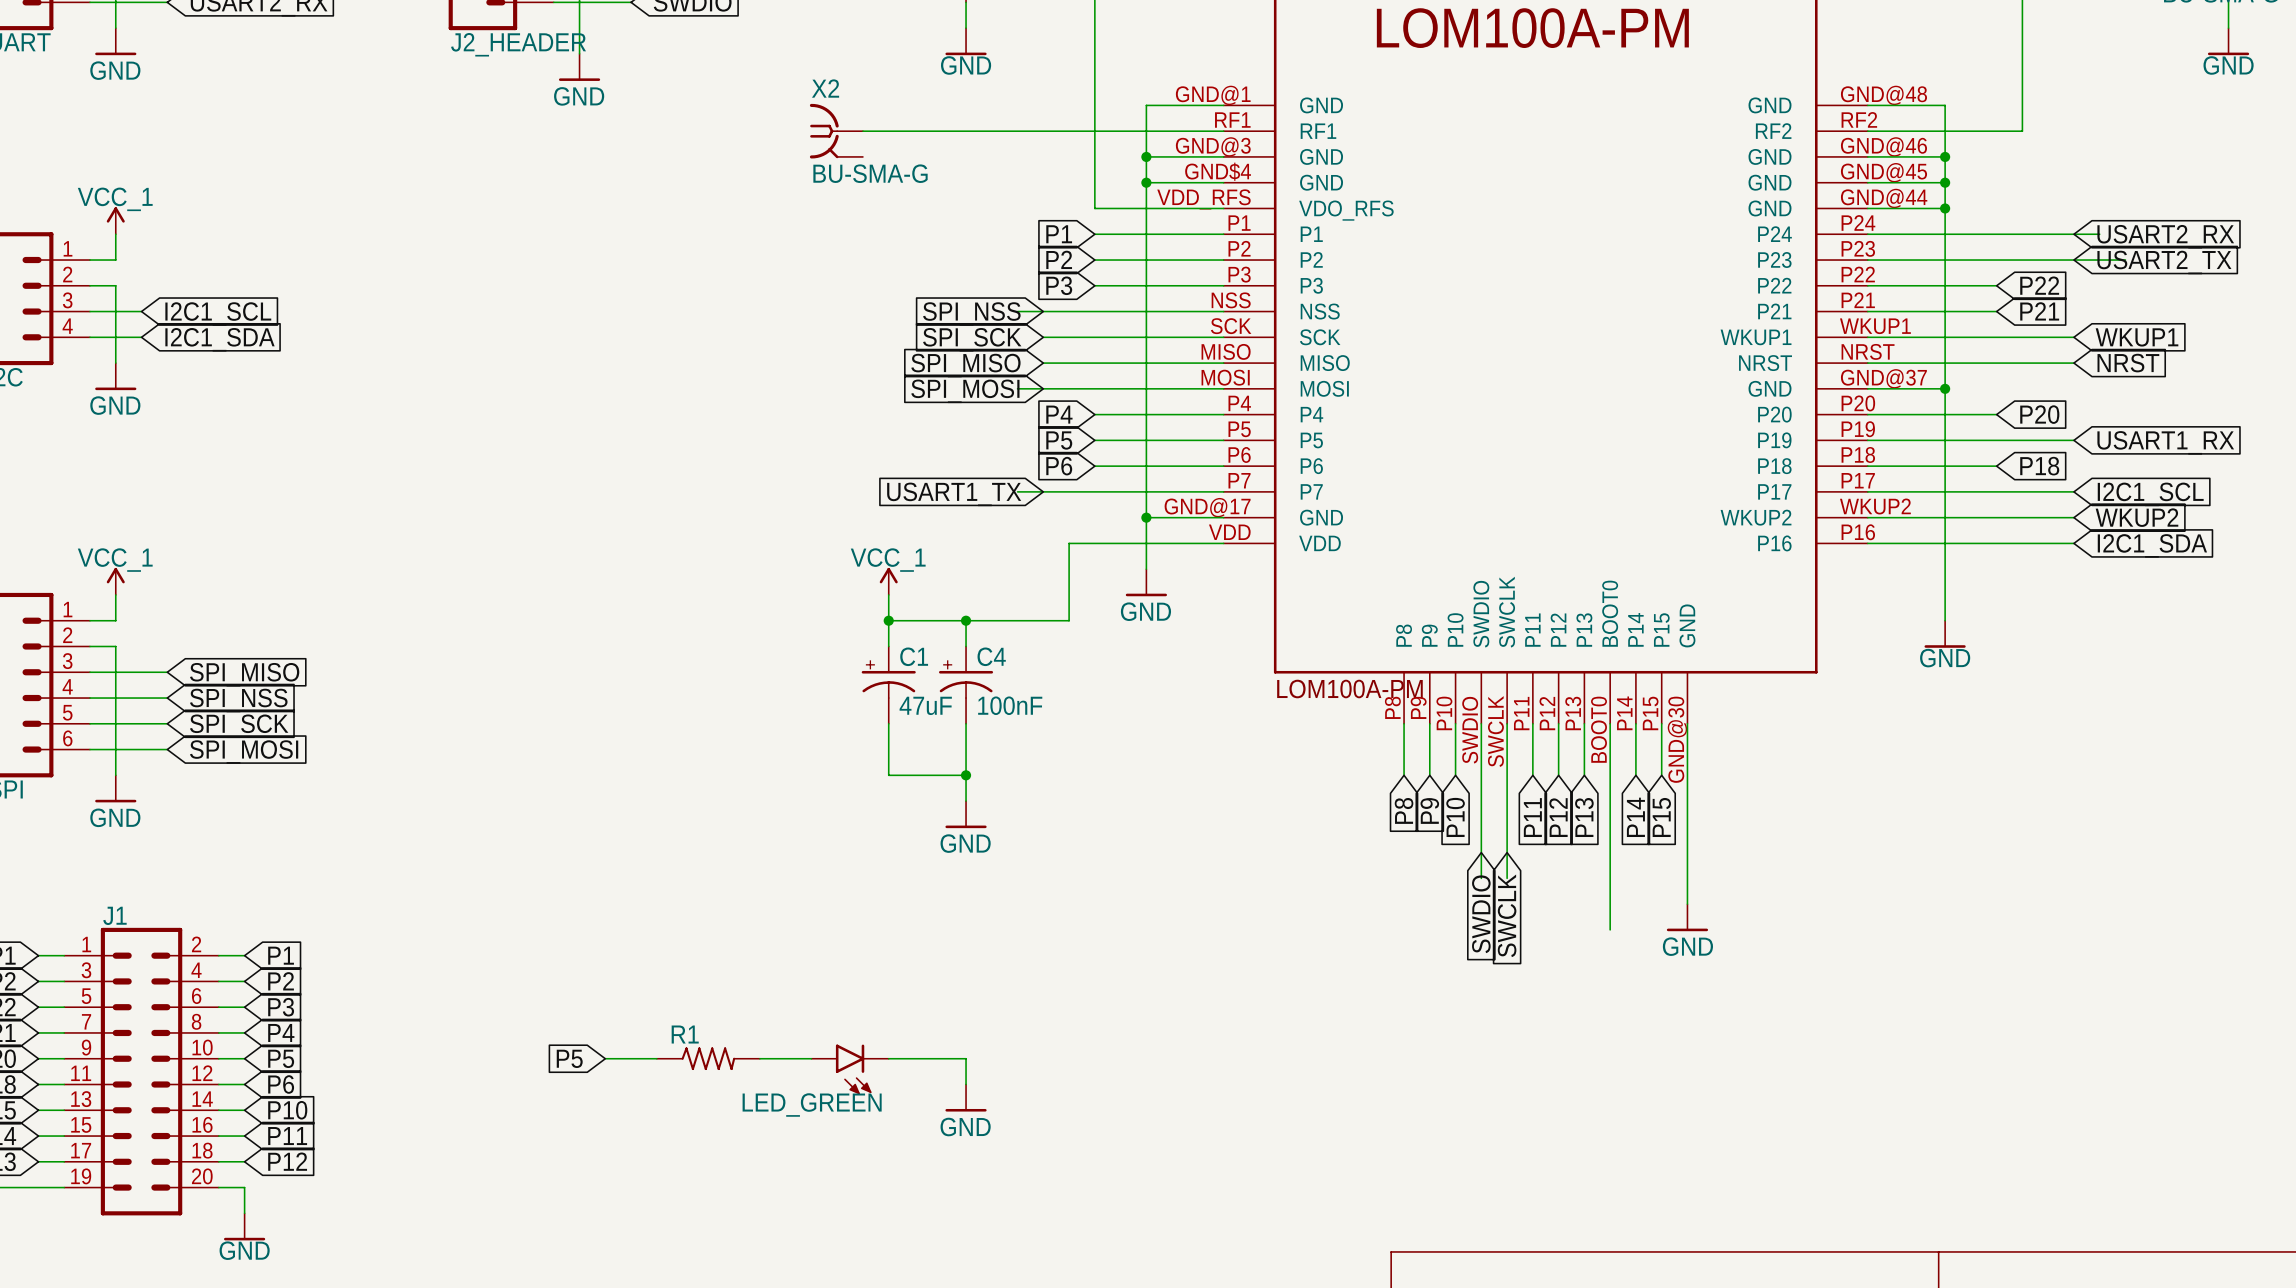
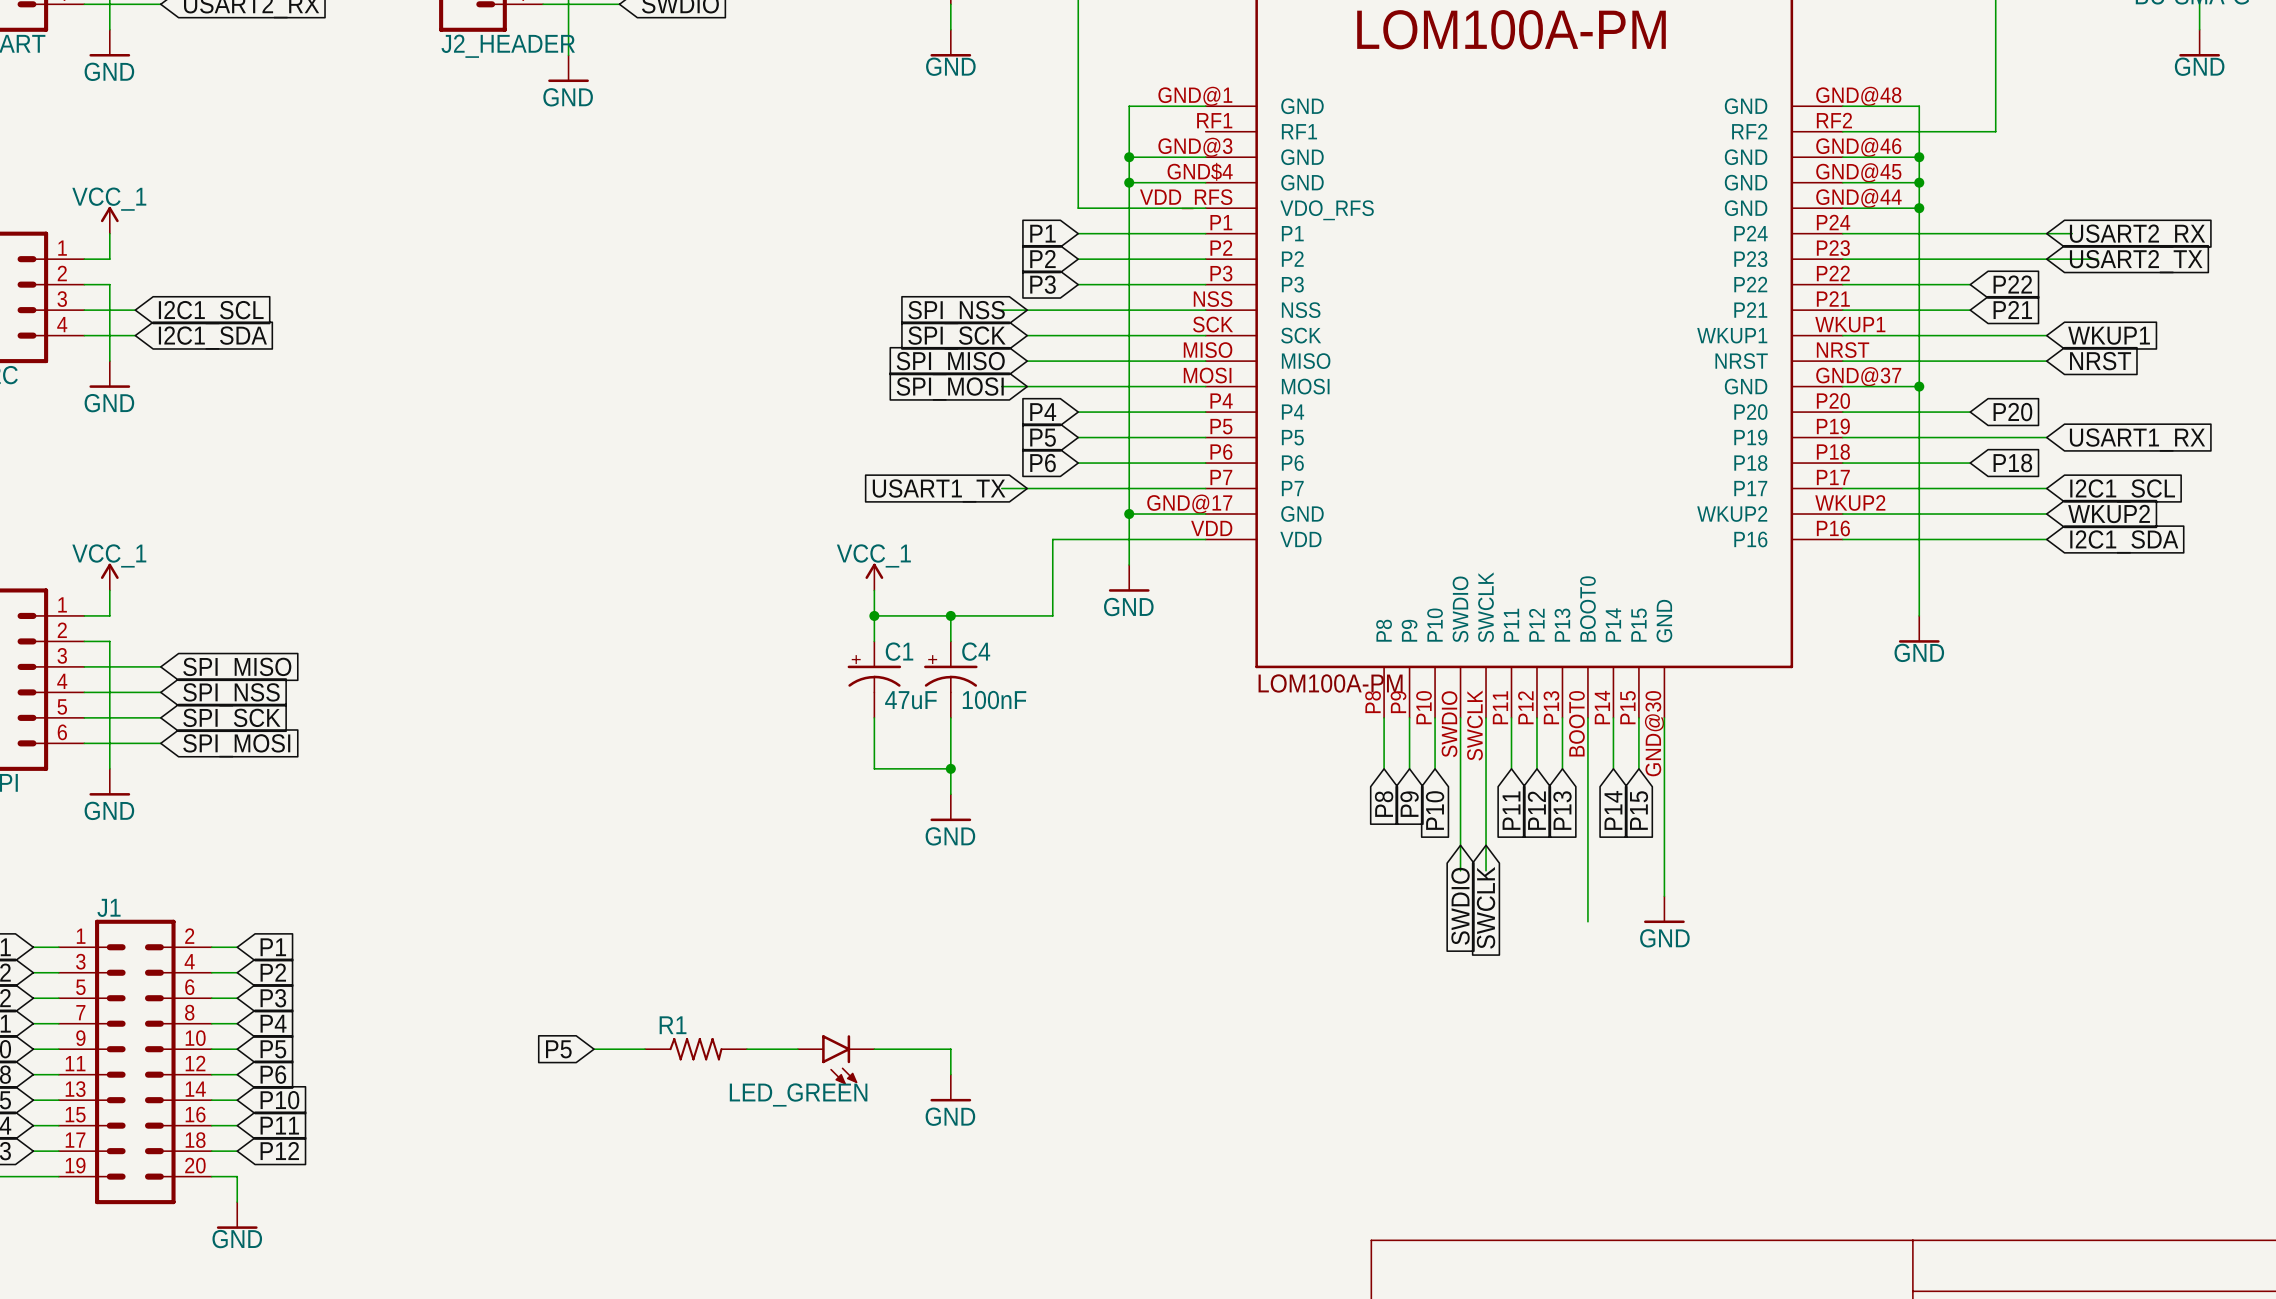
X2: BU-SMA-G (836, 131) -> none
wire: (862, 131) (1223, 131) -> none

